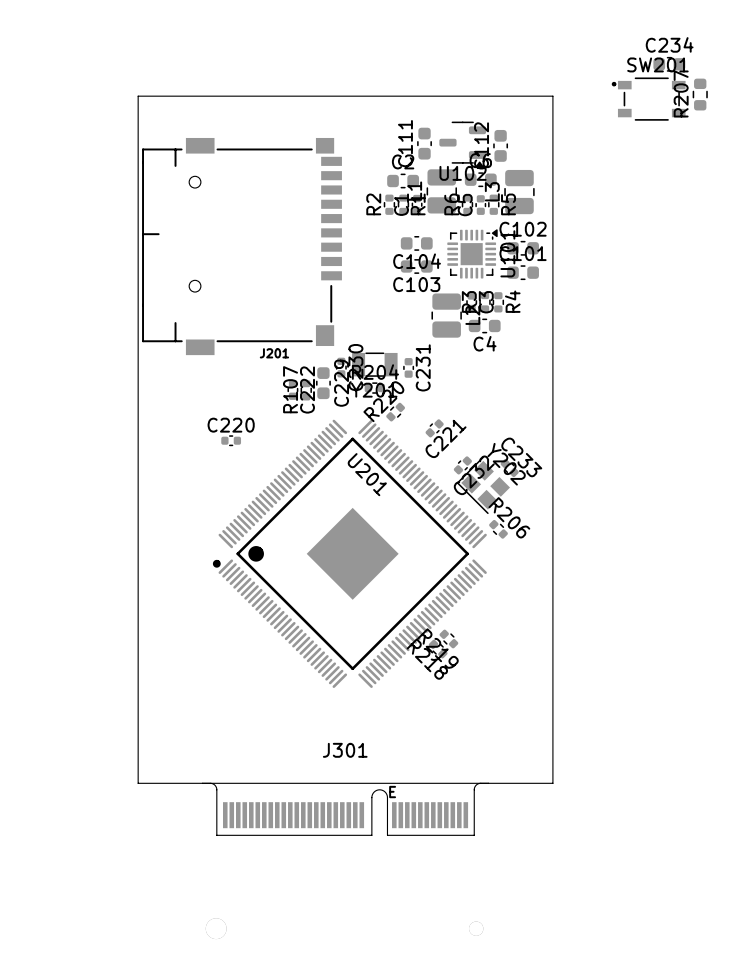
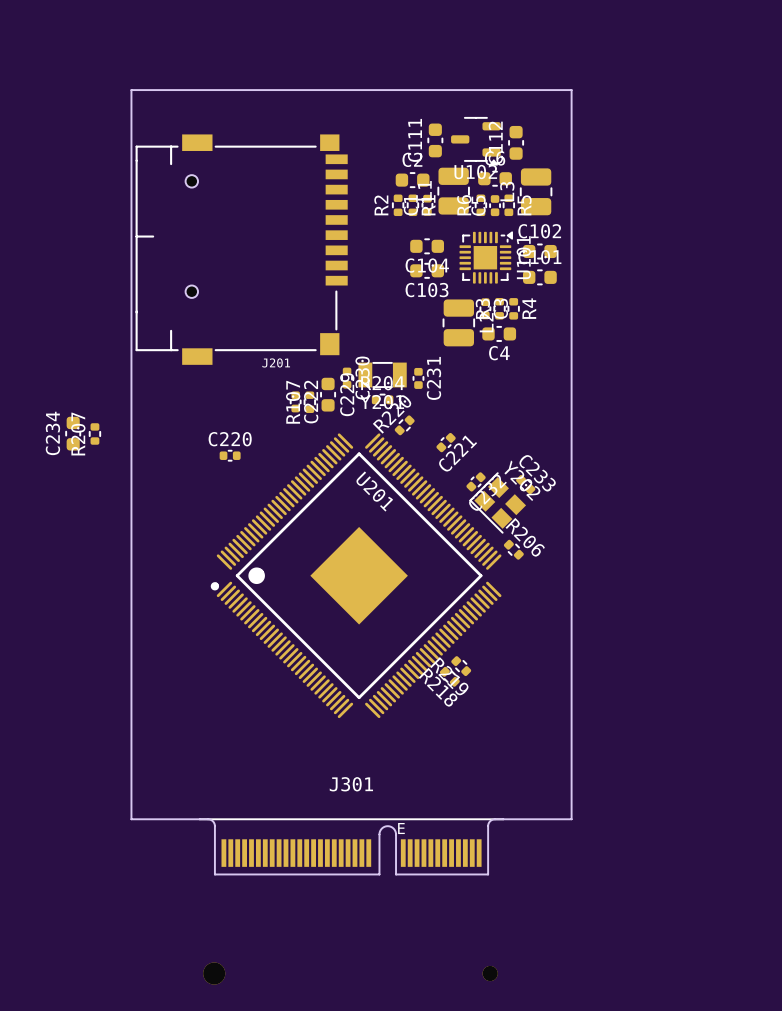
C234 name position: C234 (669, 44) -> C234 (52, 433)
C234 rotation: 0° (669, 64) -> 90° clockwise (73, 433)
C234 position: (669, 64) -> (73, 433)
R207 footprint: [692, 78, 708, 111] -> [88, 423, 102, 445]
SW201: (648, 99) -> none

